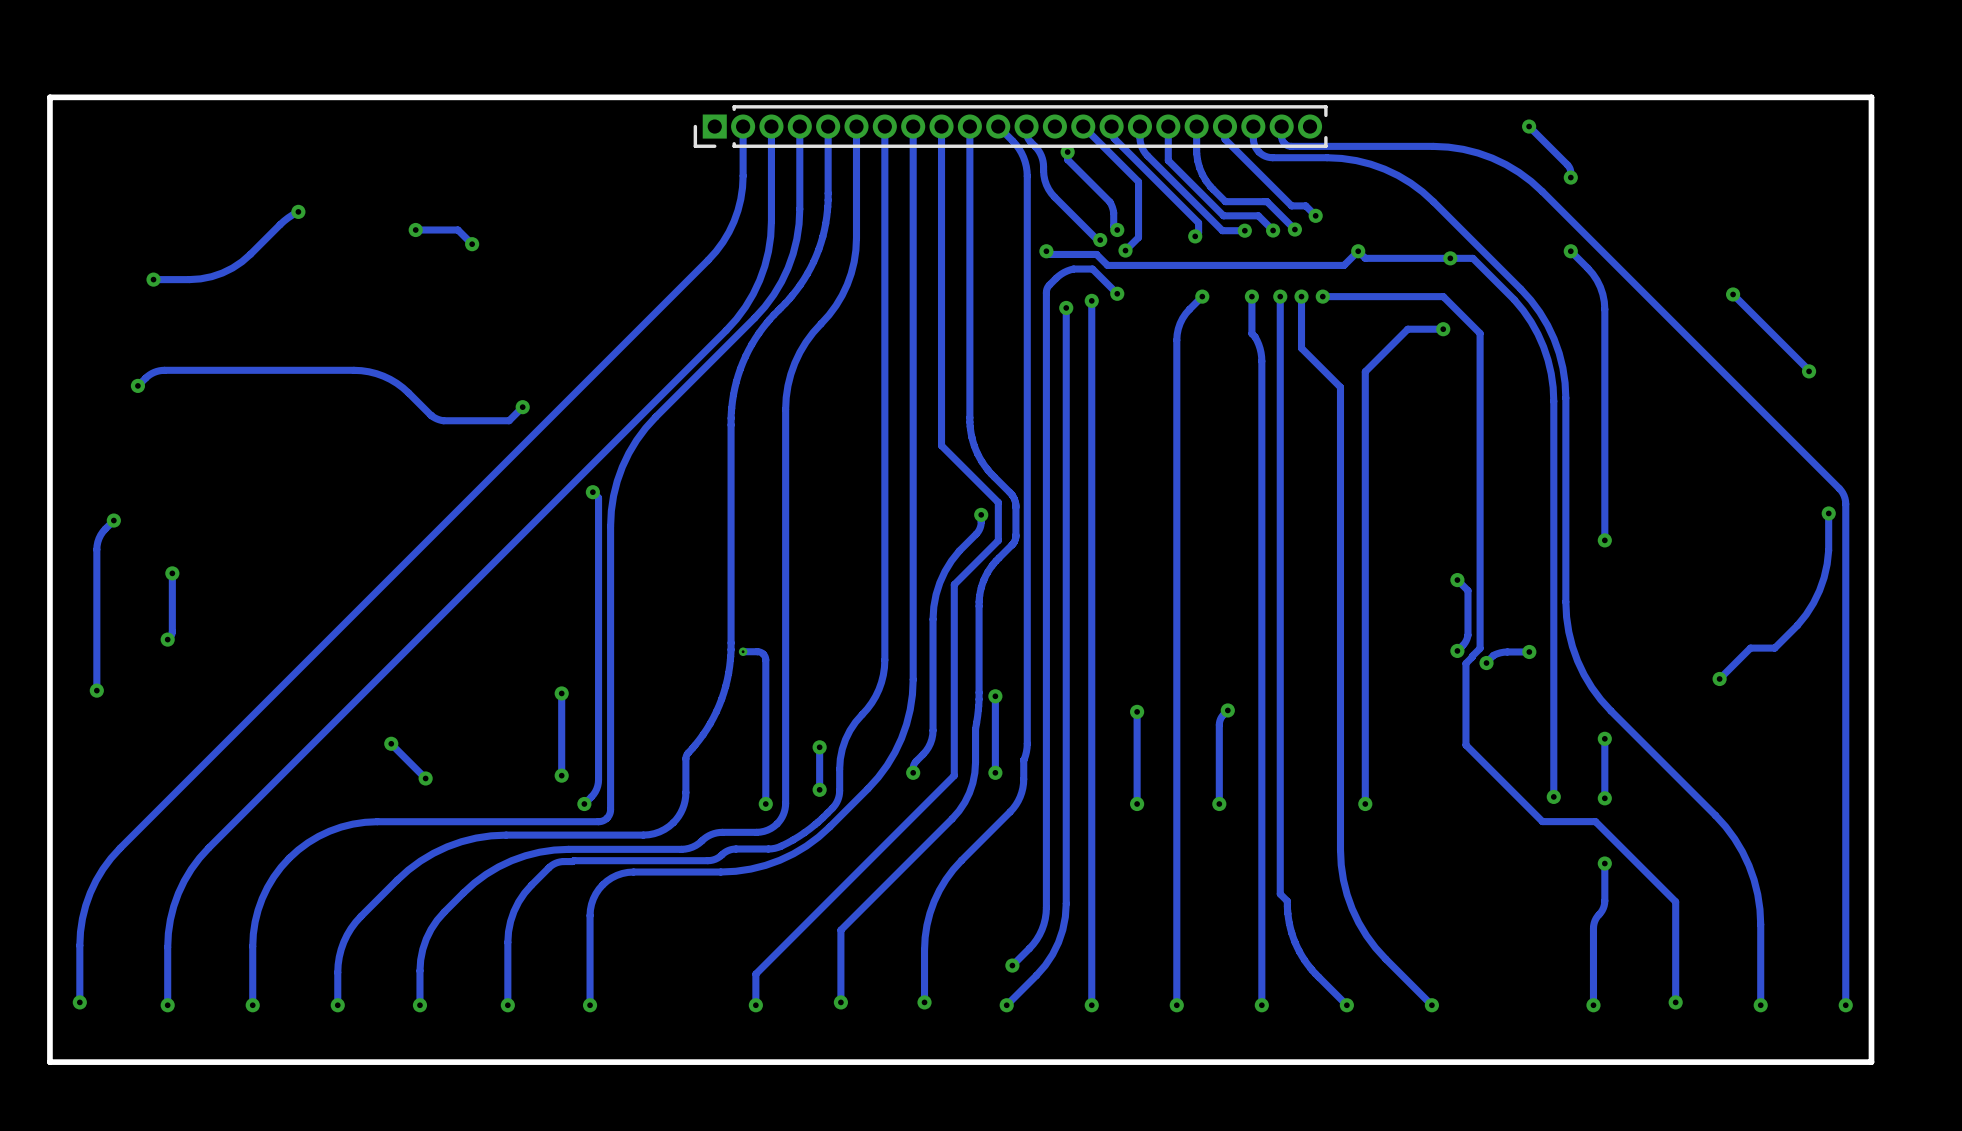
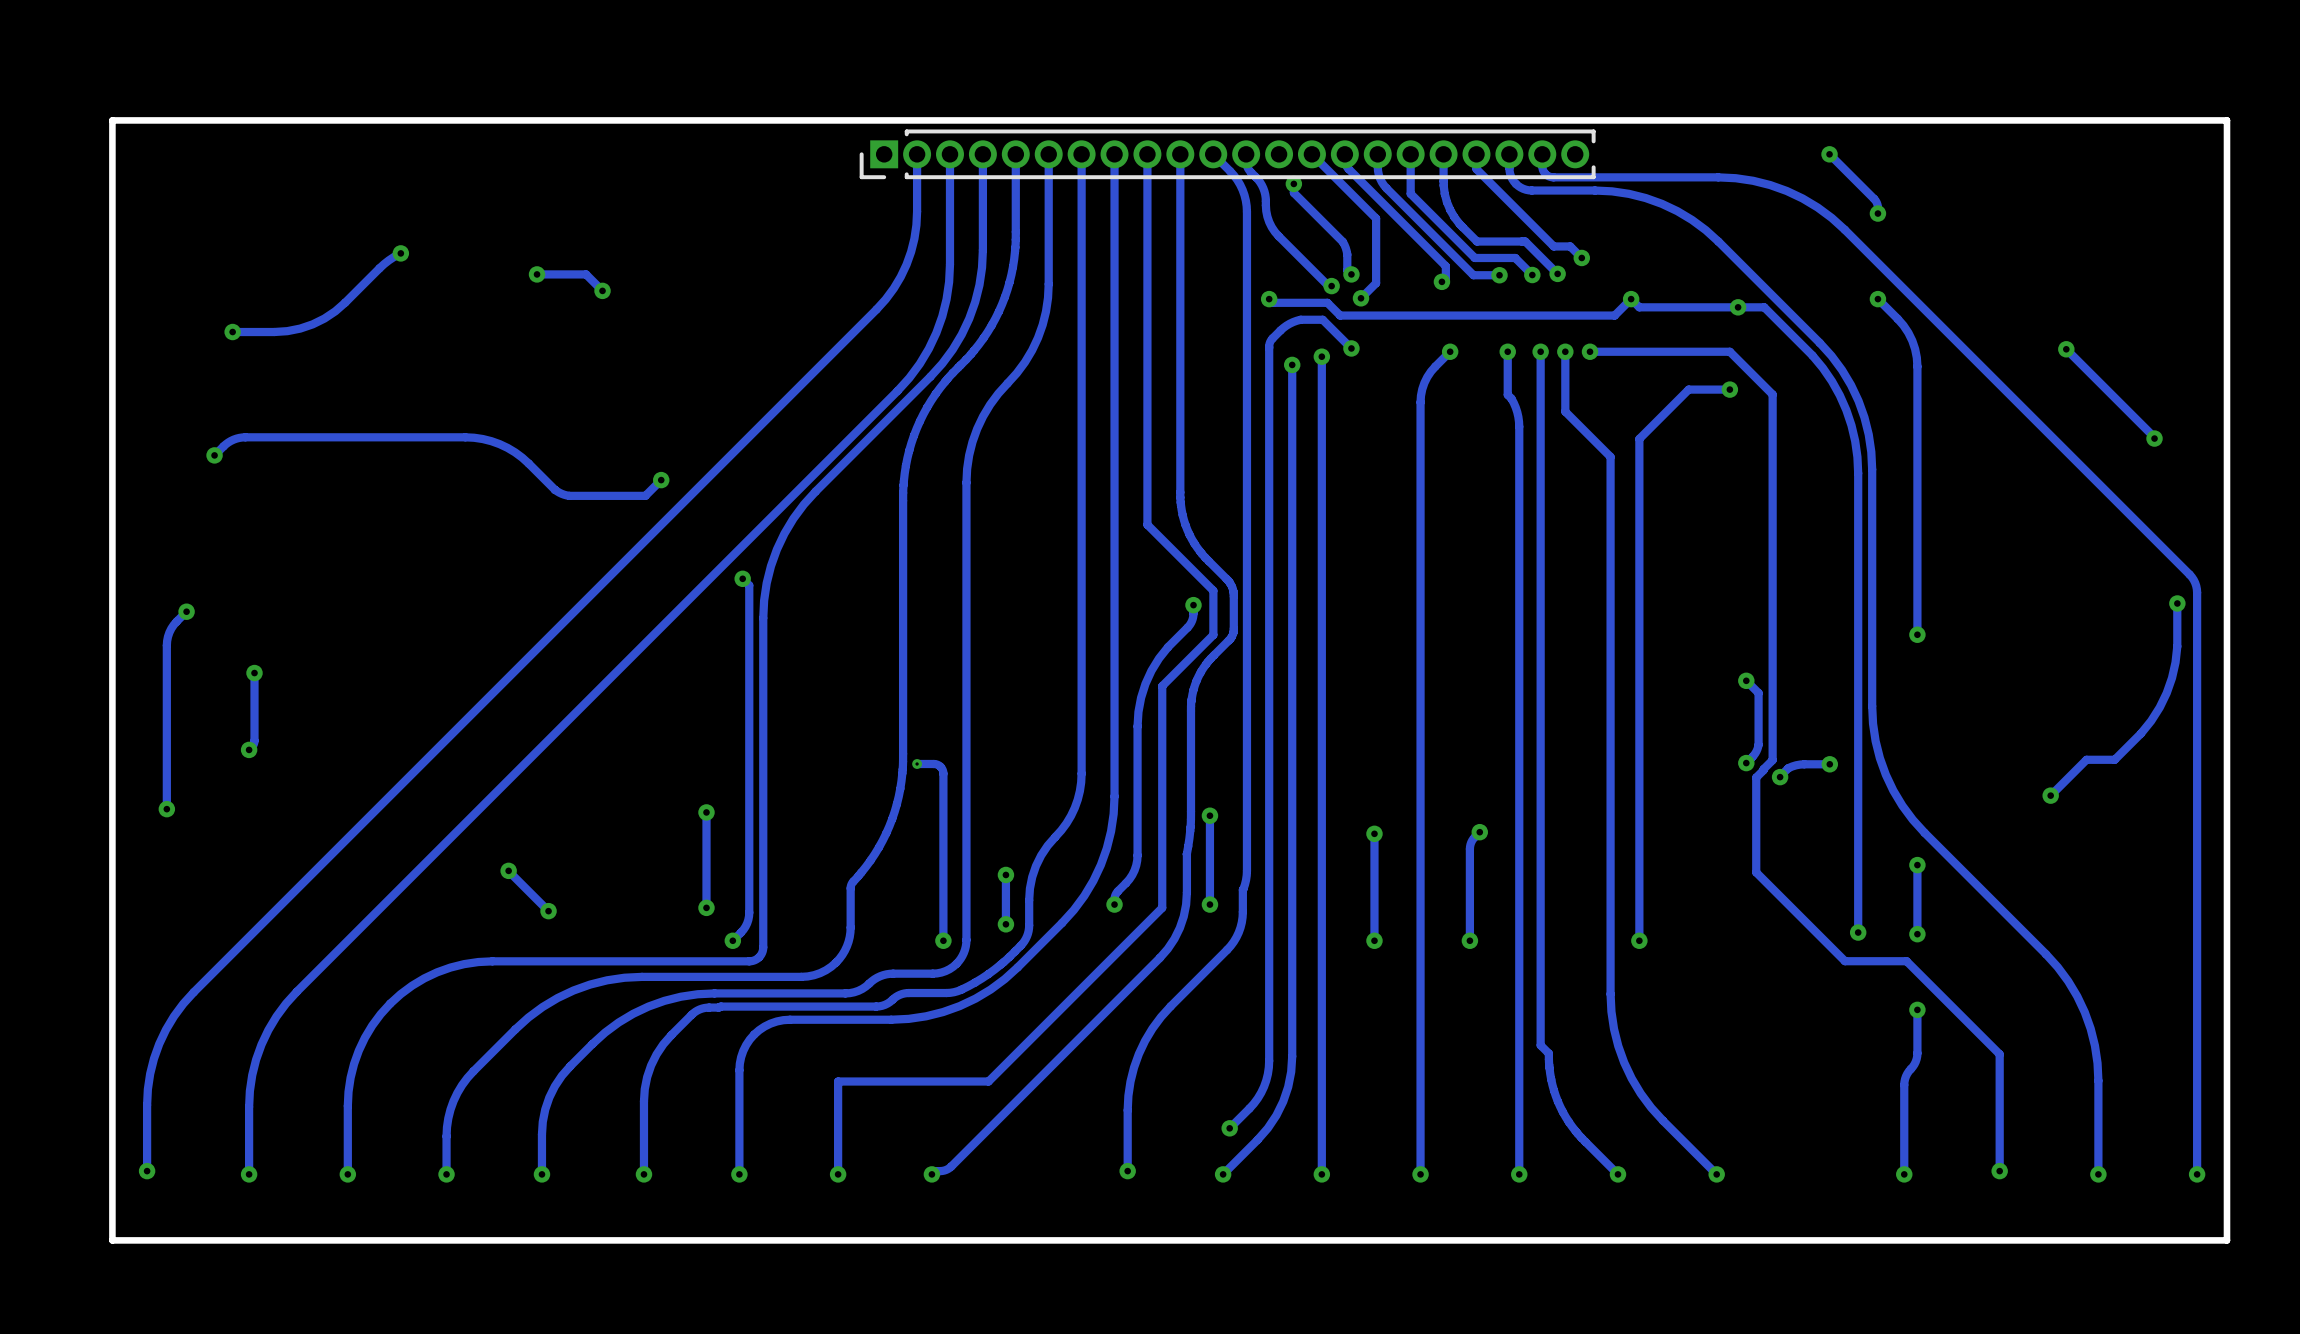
track: (804, 925) (755, 974) (755, 1005) -> (988, 1081) (838, 1081) (838, 1174)
track: (840, 930) (840, 1002) -> (1030, 1087) (949, 1167) (944, 1170) (933, 1171)
via position: (840, 1002) -> (838, 1174)

